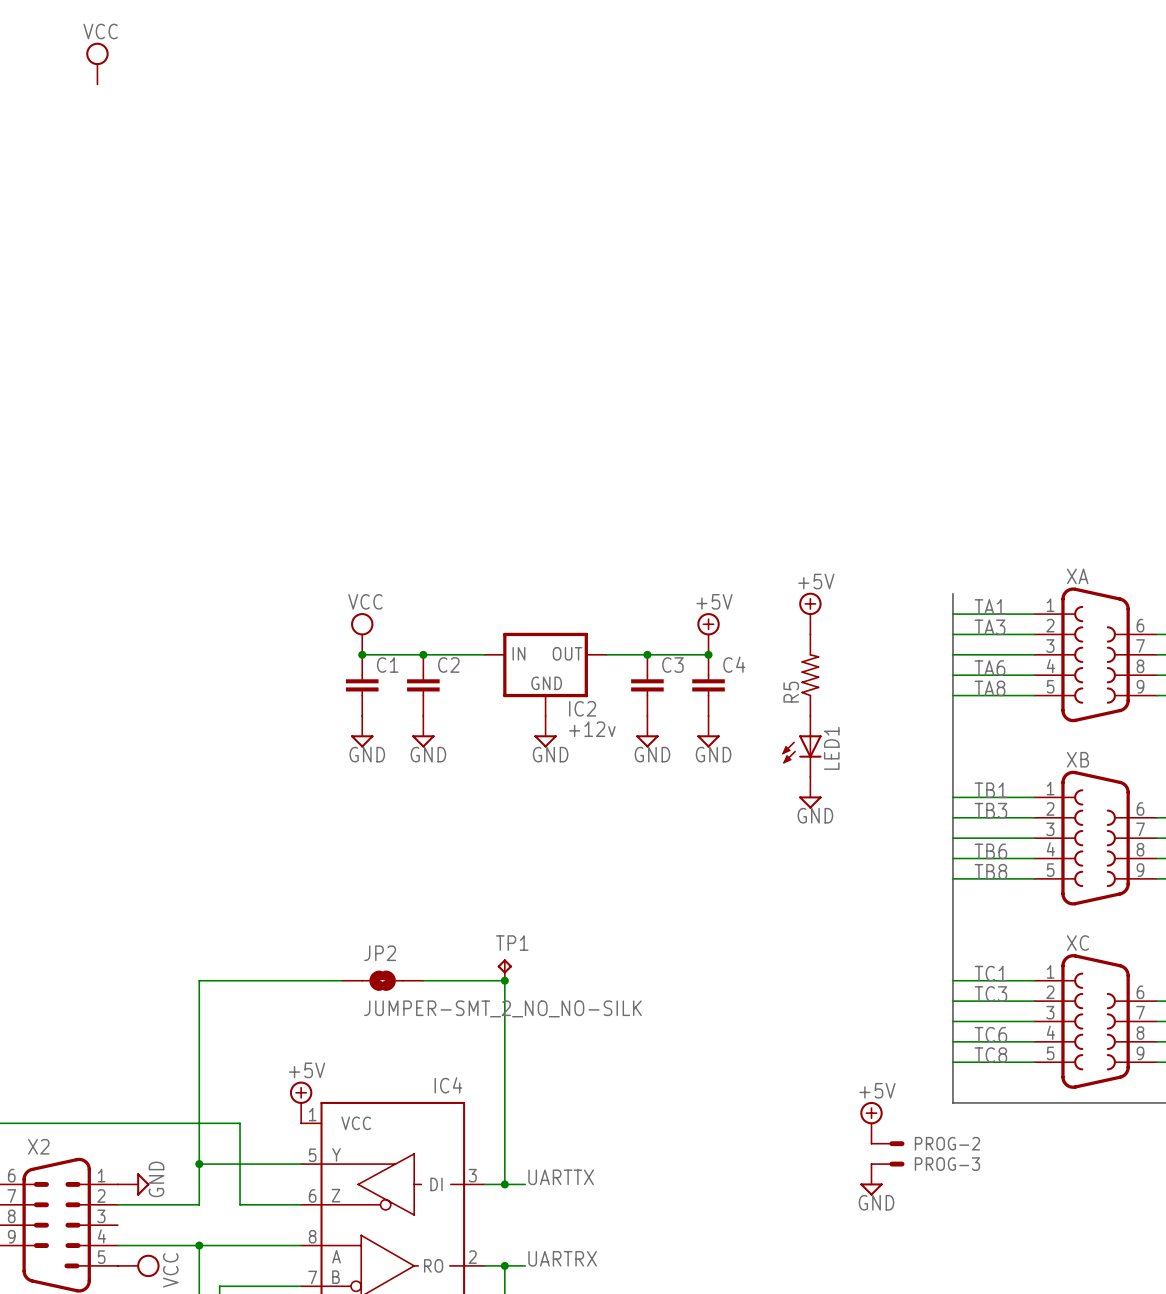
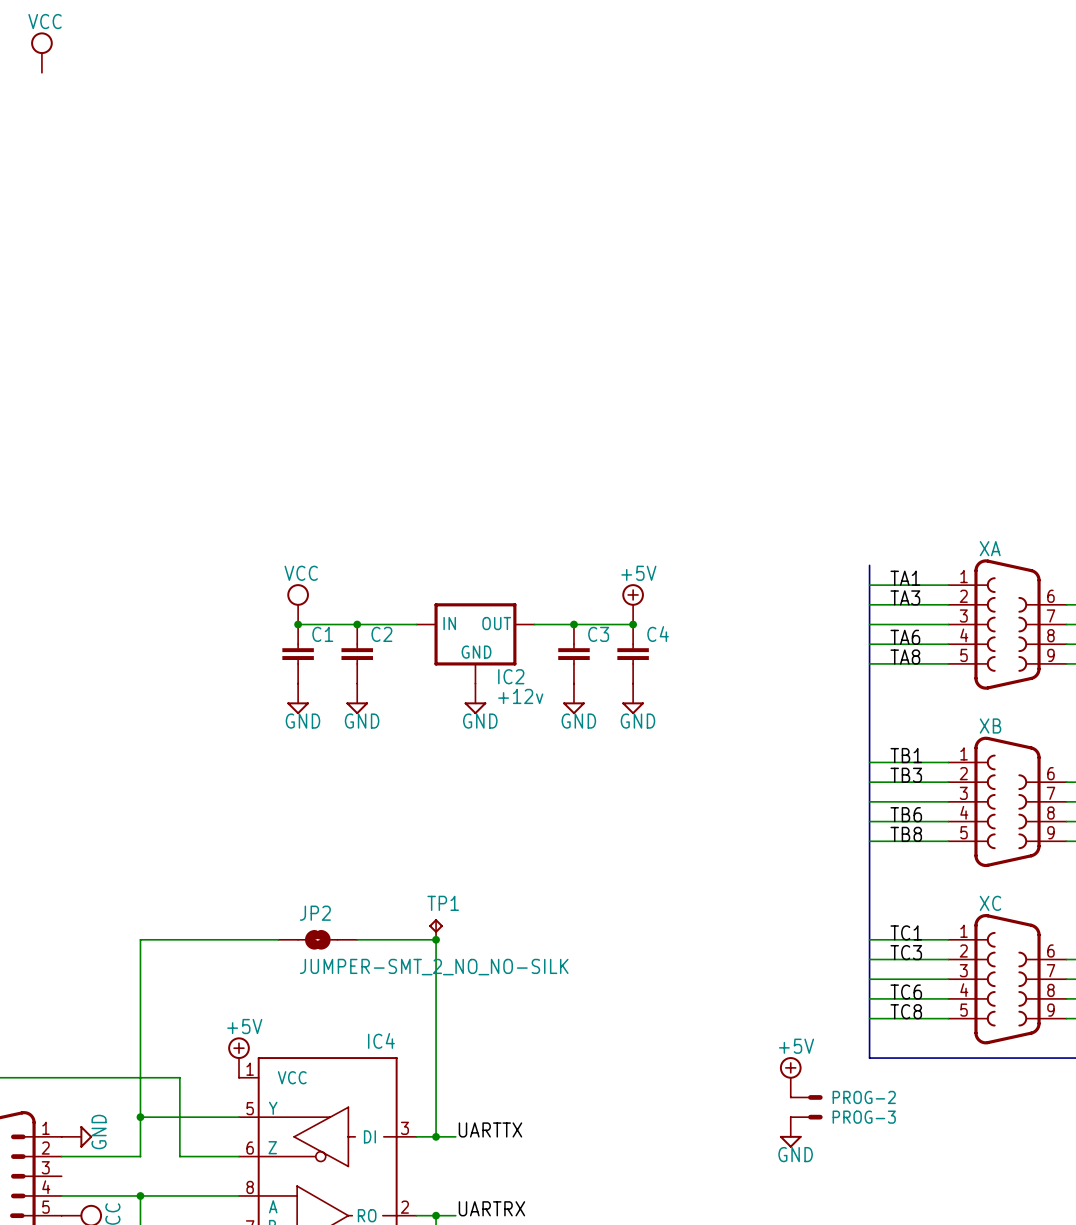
power symbol: +5V (810, 613) -> none
R5: (810, 675) -> none
LED1: (801, 746) -> none
power symbol: GND (810, 792) -> none

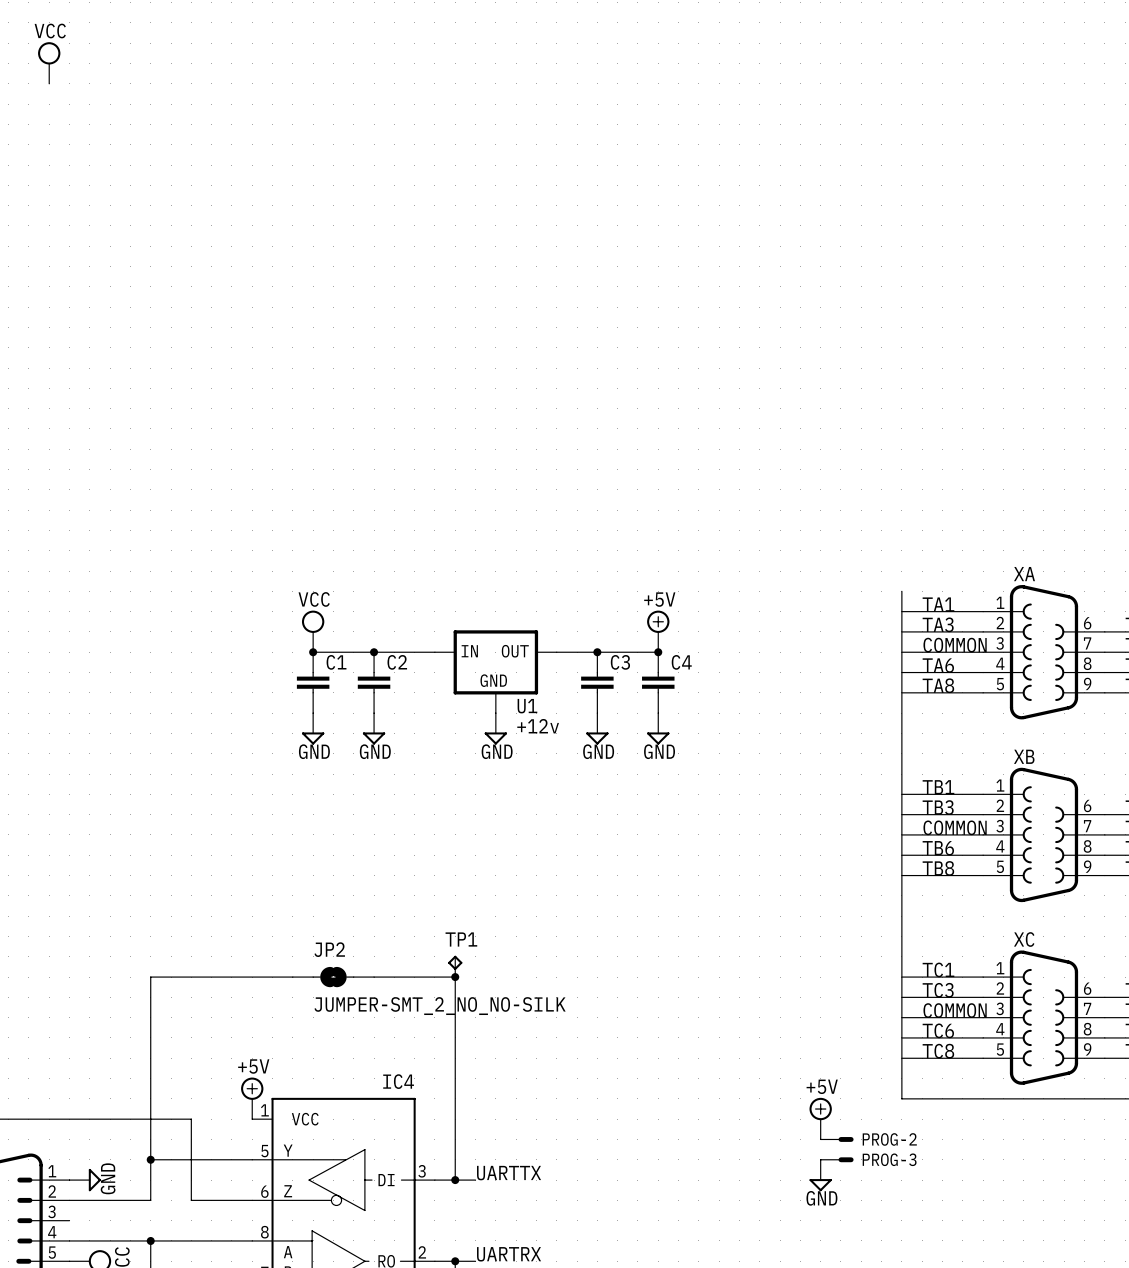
label: none -> COMMON (955, 645)
IC2 name: IC2 (511, 676) -> U1 (527, 706)
label: none -> COMMON (955, 827)
label: none -> COMMON (955, 1010)

